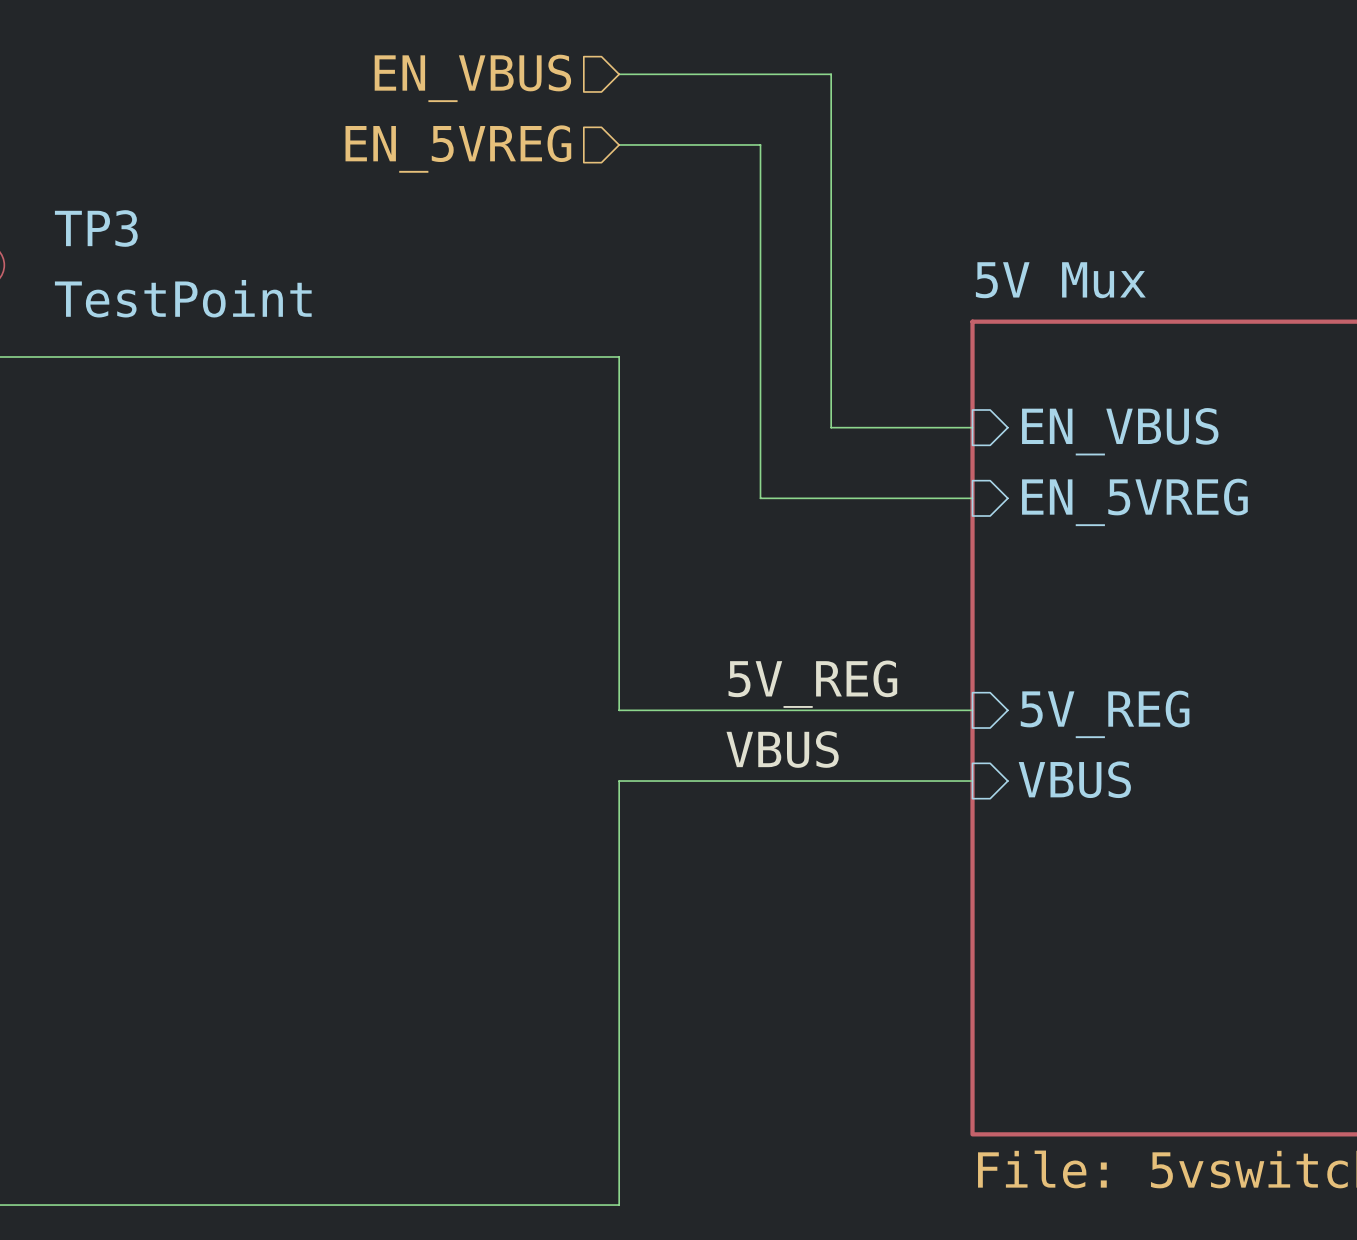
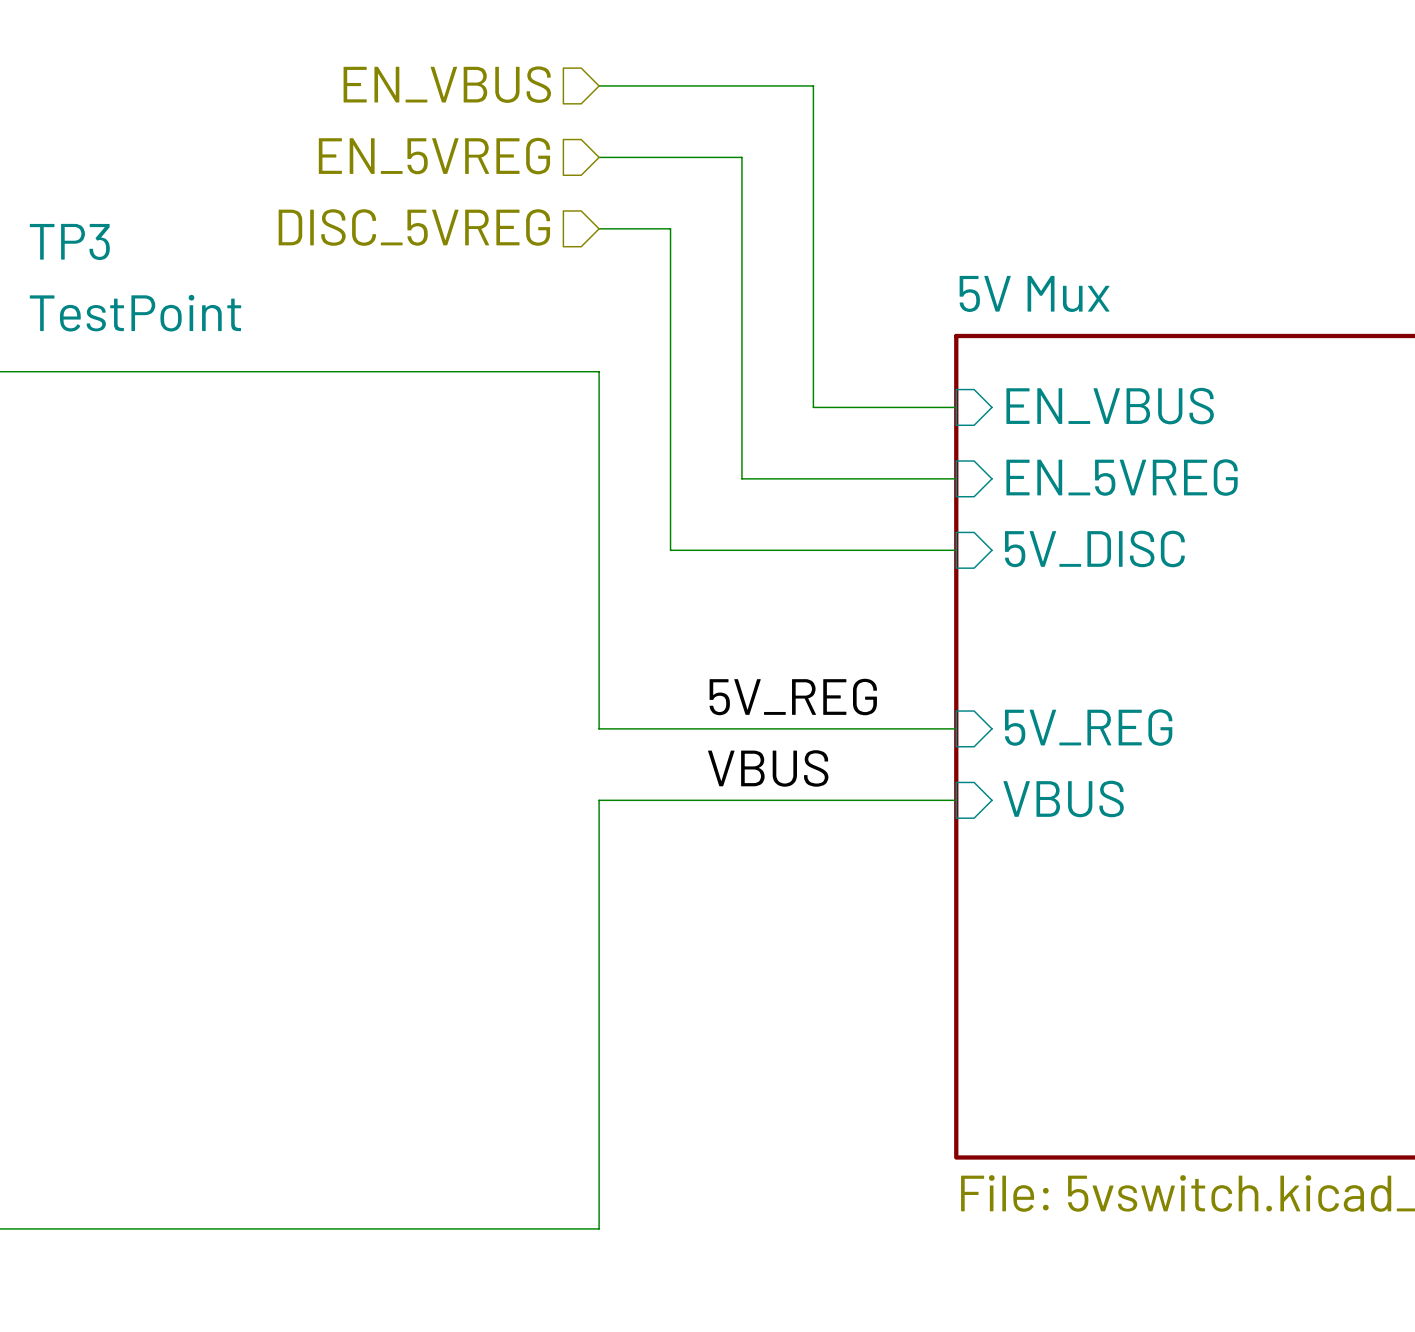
wire: none -> (599, 228) (670, 228) (670, 550) (956, 550)
hierarchical label: none -> DISC_5VREG (414, 227)
wire: (831, 392) (831, 427) (972, 427) -> (813, 407) (956, 407)
sheet pin position: EN_VBUS (1120, 431) -> EN_VBUS (1110, 406)
wire: (760, 463) (760, 498) (972, 498) -> (741, 478) (956, 478)
sheet pin position: EN_5VREG (1134, 502) -> EN_5VREG (1122, 477)
sheet pin: none -> 5V_DISC (1094, 548)

